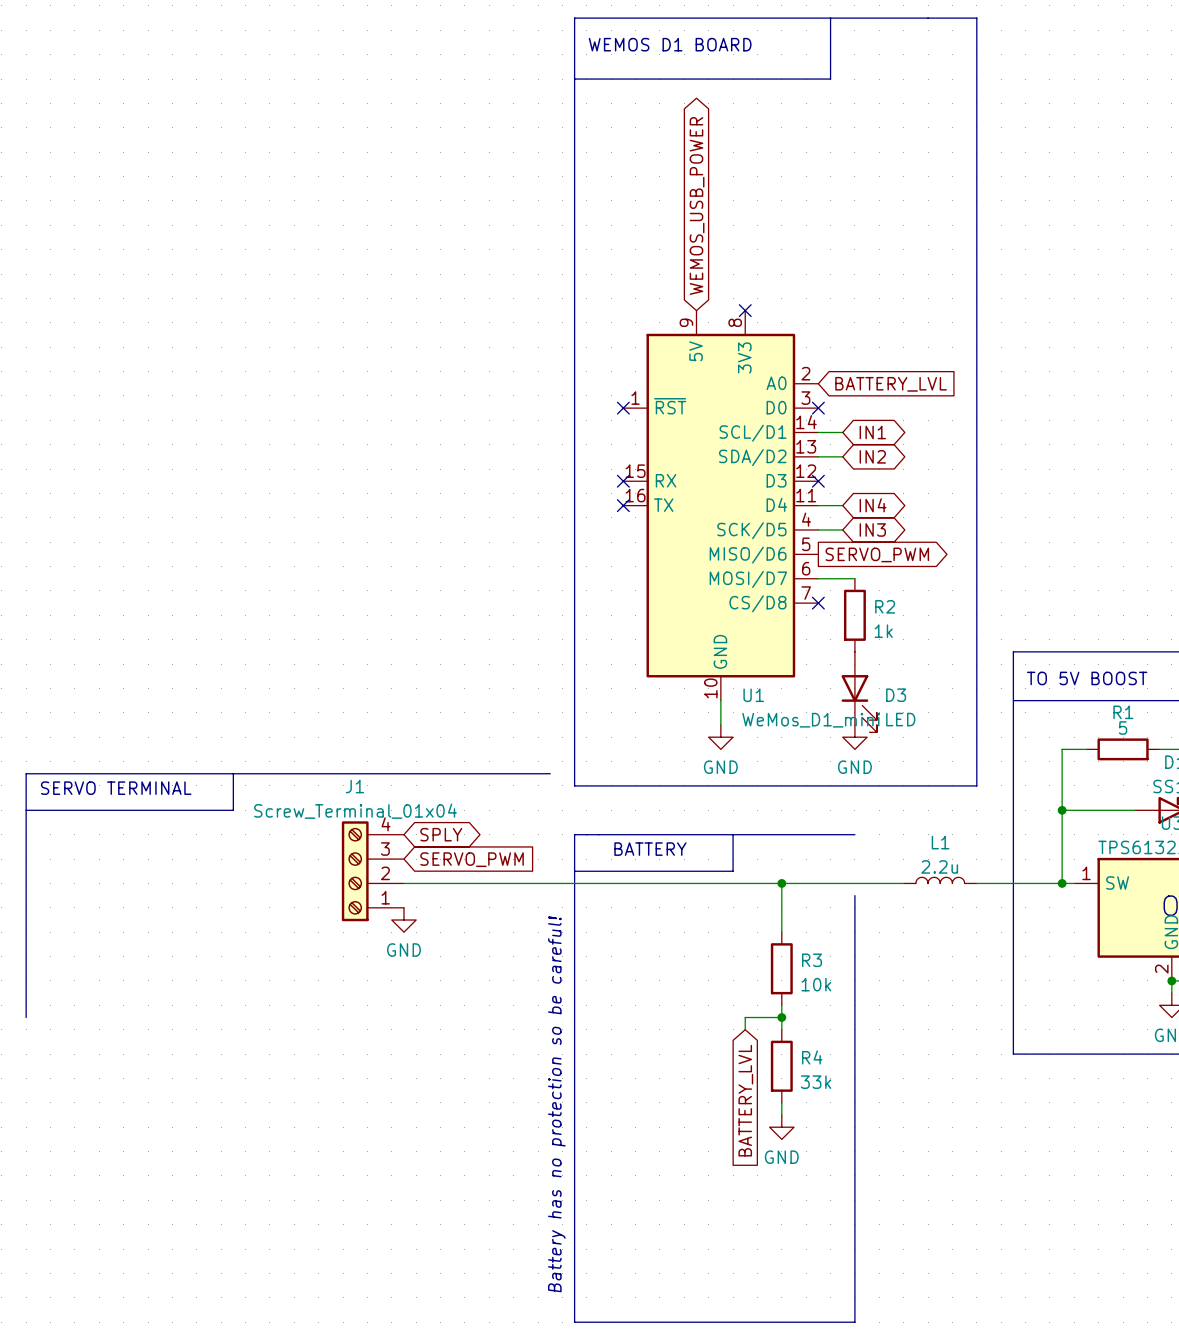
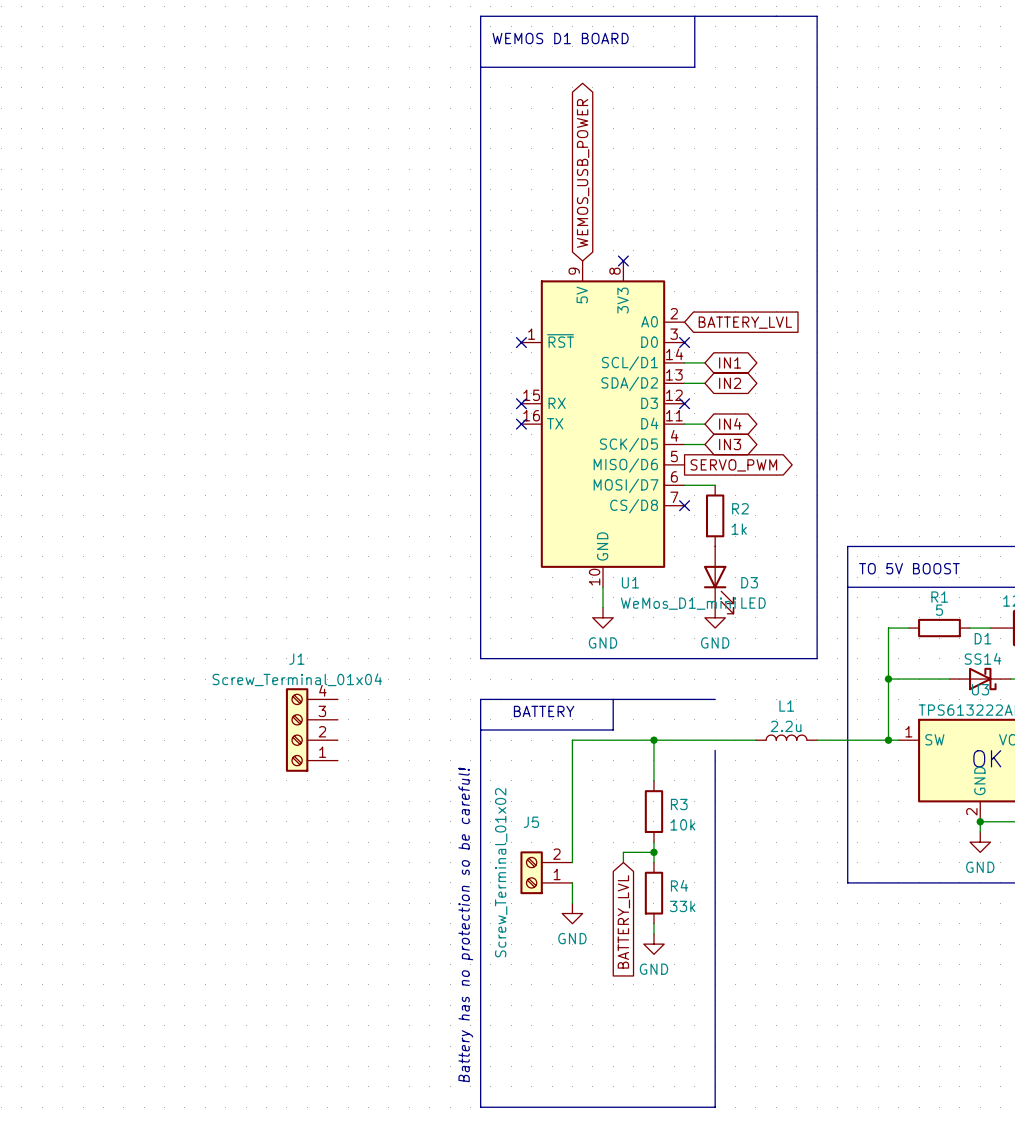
line: (233, 773) (233, 810) (26, 810) -> none
line: (550, 773) (26, 773) (26, 1017) -> none
text: SERVO TERMINAL (116, 788) -> none
global label: SPLY (441, 834) -> none
global label: SERVO_PWM (472, 859) -> none
wire: (403, 883) (684, 883) -> (572, 862) (572, 740)
power symbol: GND (403, 920) -> none
J5: none -> Screw_Terminal_01x02 (546, 872)
wire: none -> (572, 882) (572, 903)
power symbol: none -> GND (572, 913)

